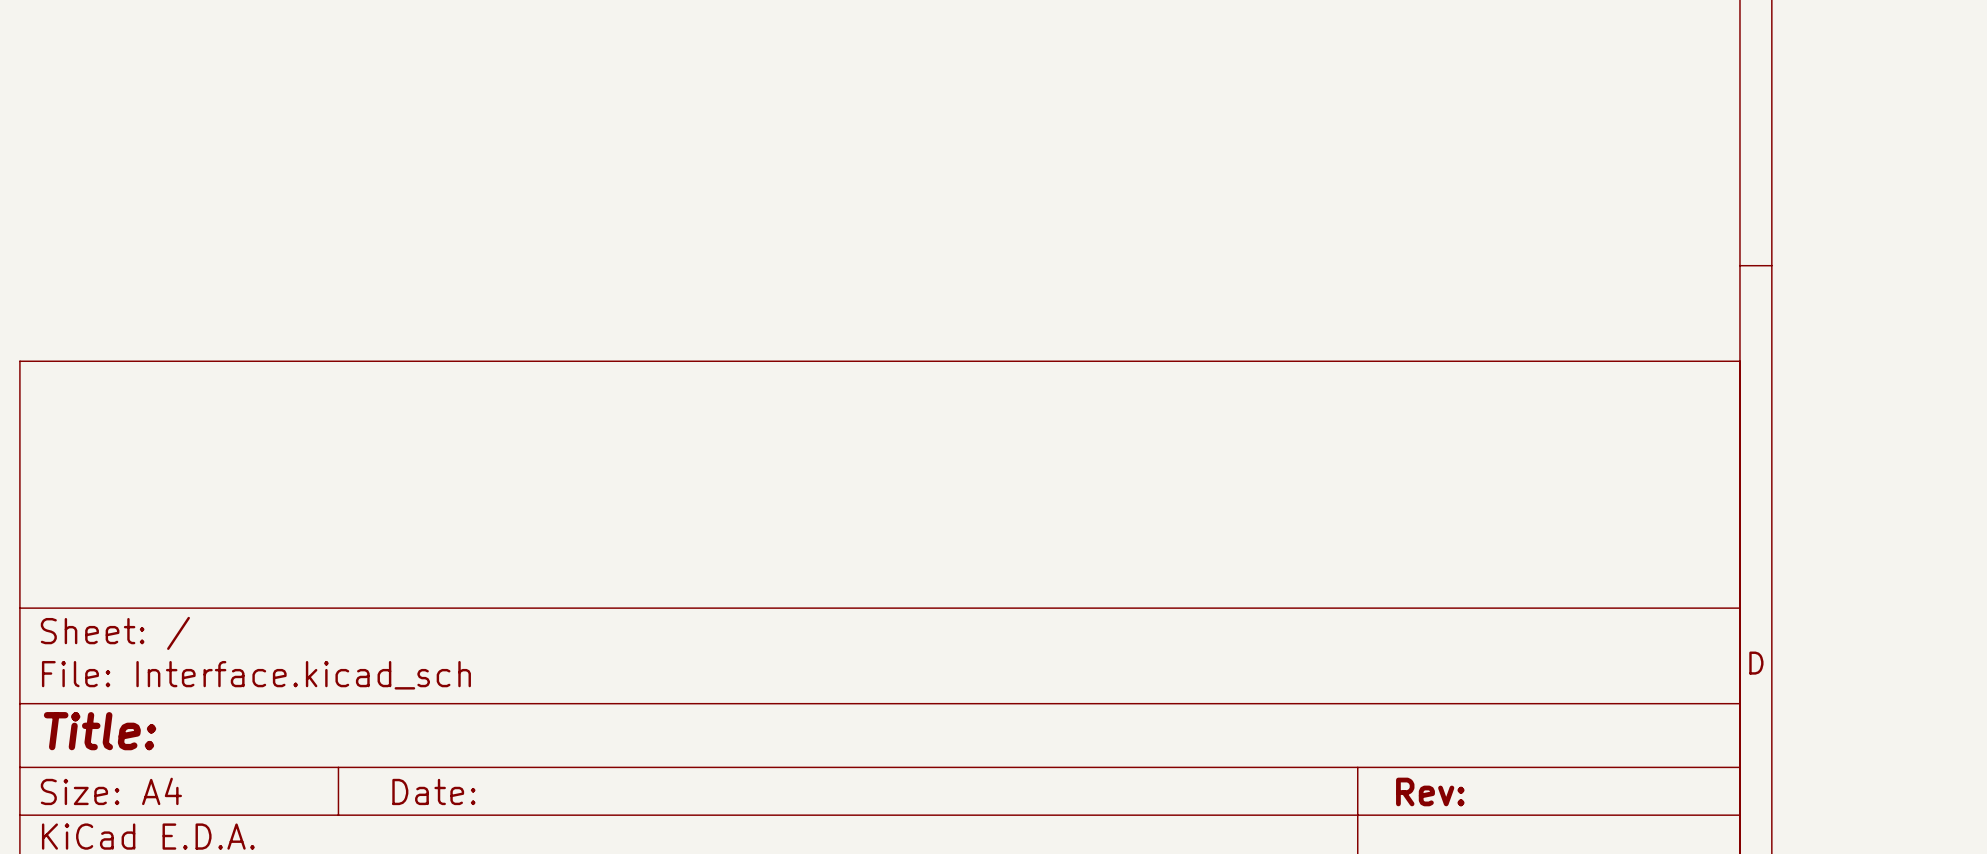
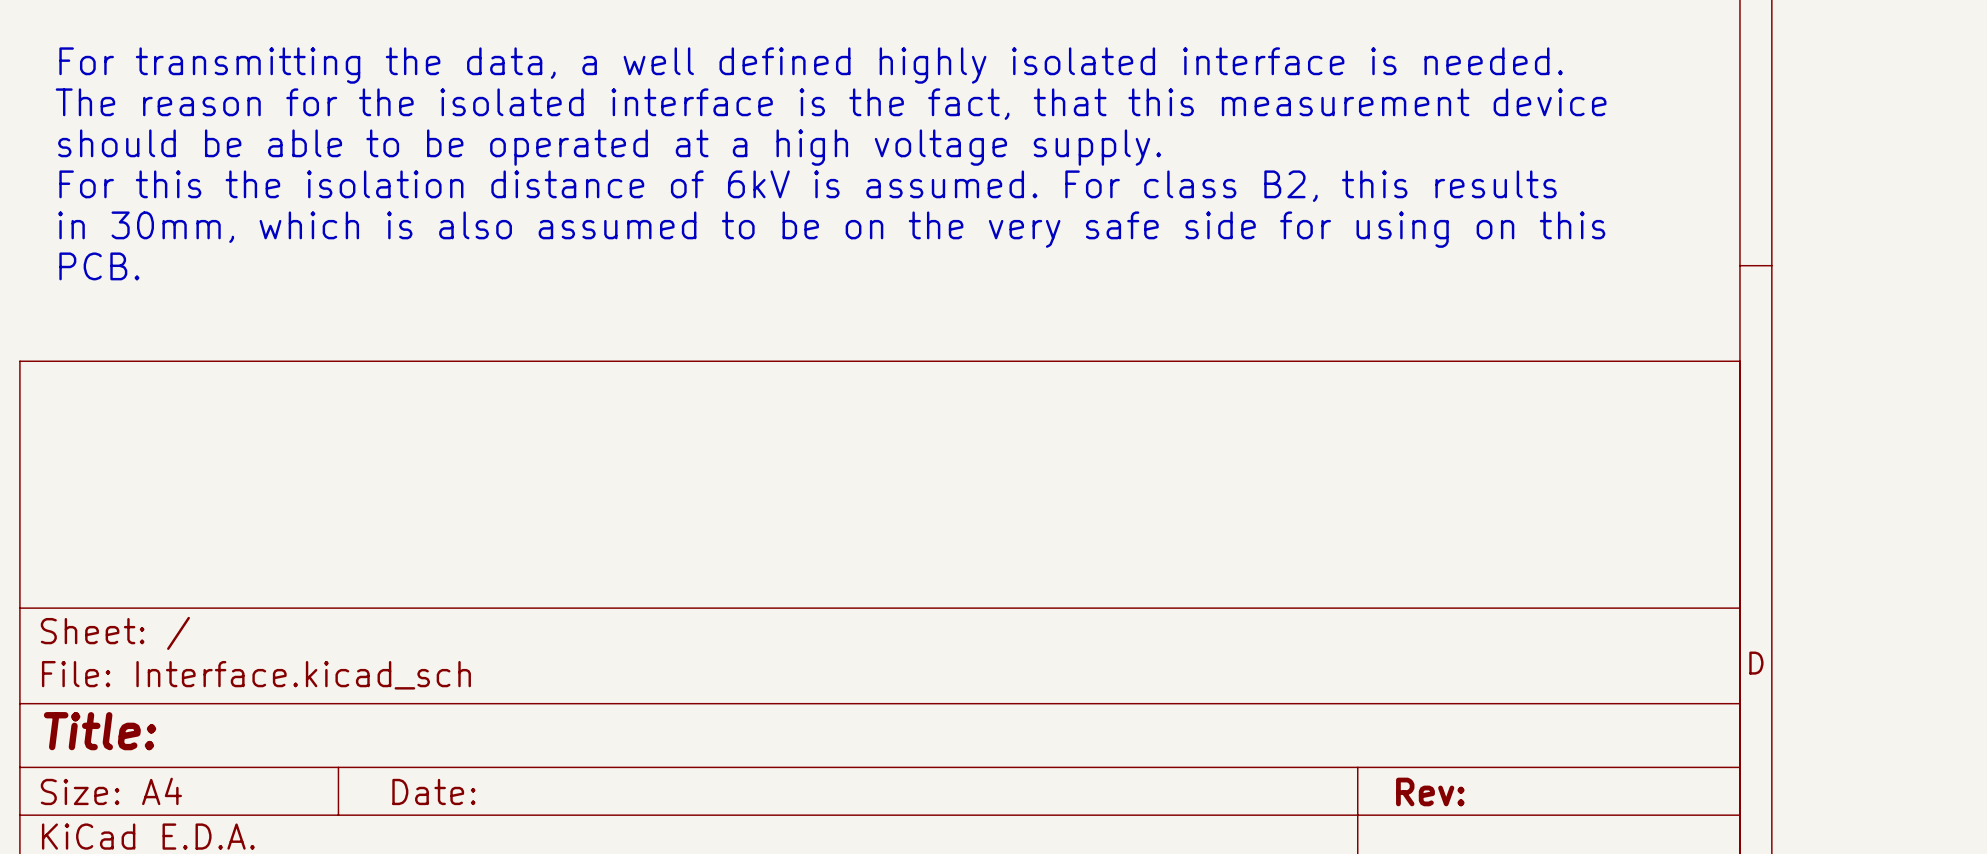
text: none -> For transmitting the data, a well defined highly isolated interface is needed. (811, 65)
text: none -> The reason for the isolated interface is the fact, that this measurement device (831, 104)
text: none -> should be able to be operated at a high voltage supply. (609, 147)
text: none -> For this the isolation distance of 6kV is assumed. For class B2, this results (808, 186)
text: none -> in 30mm, which is also assumed to be on the very safe side for using on this (831, 229)
text: none -> PCB. (99, 266)

